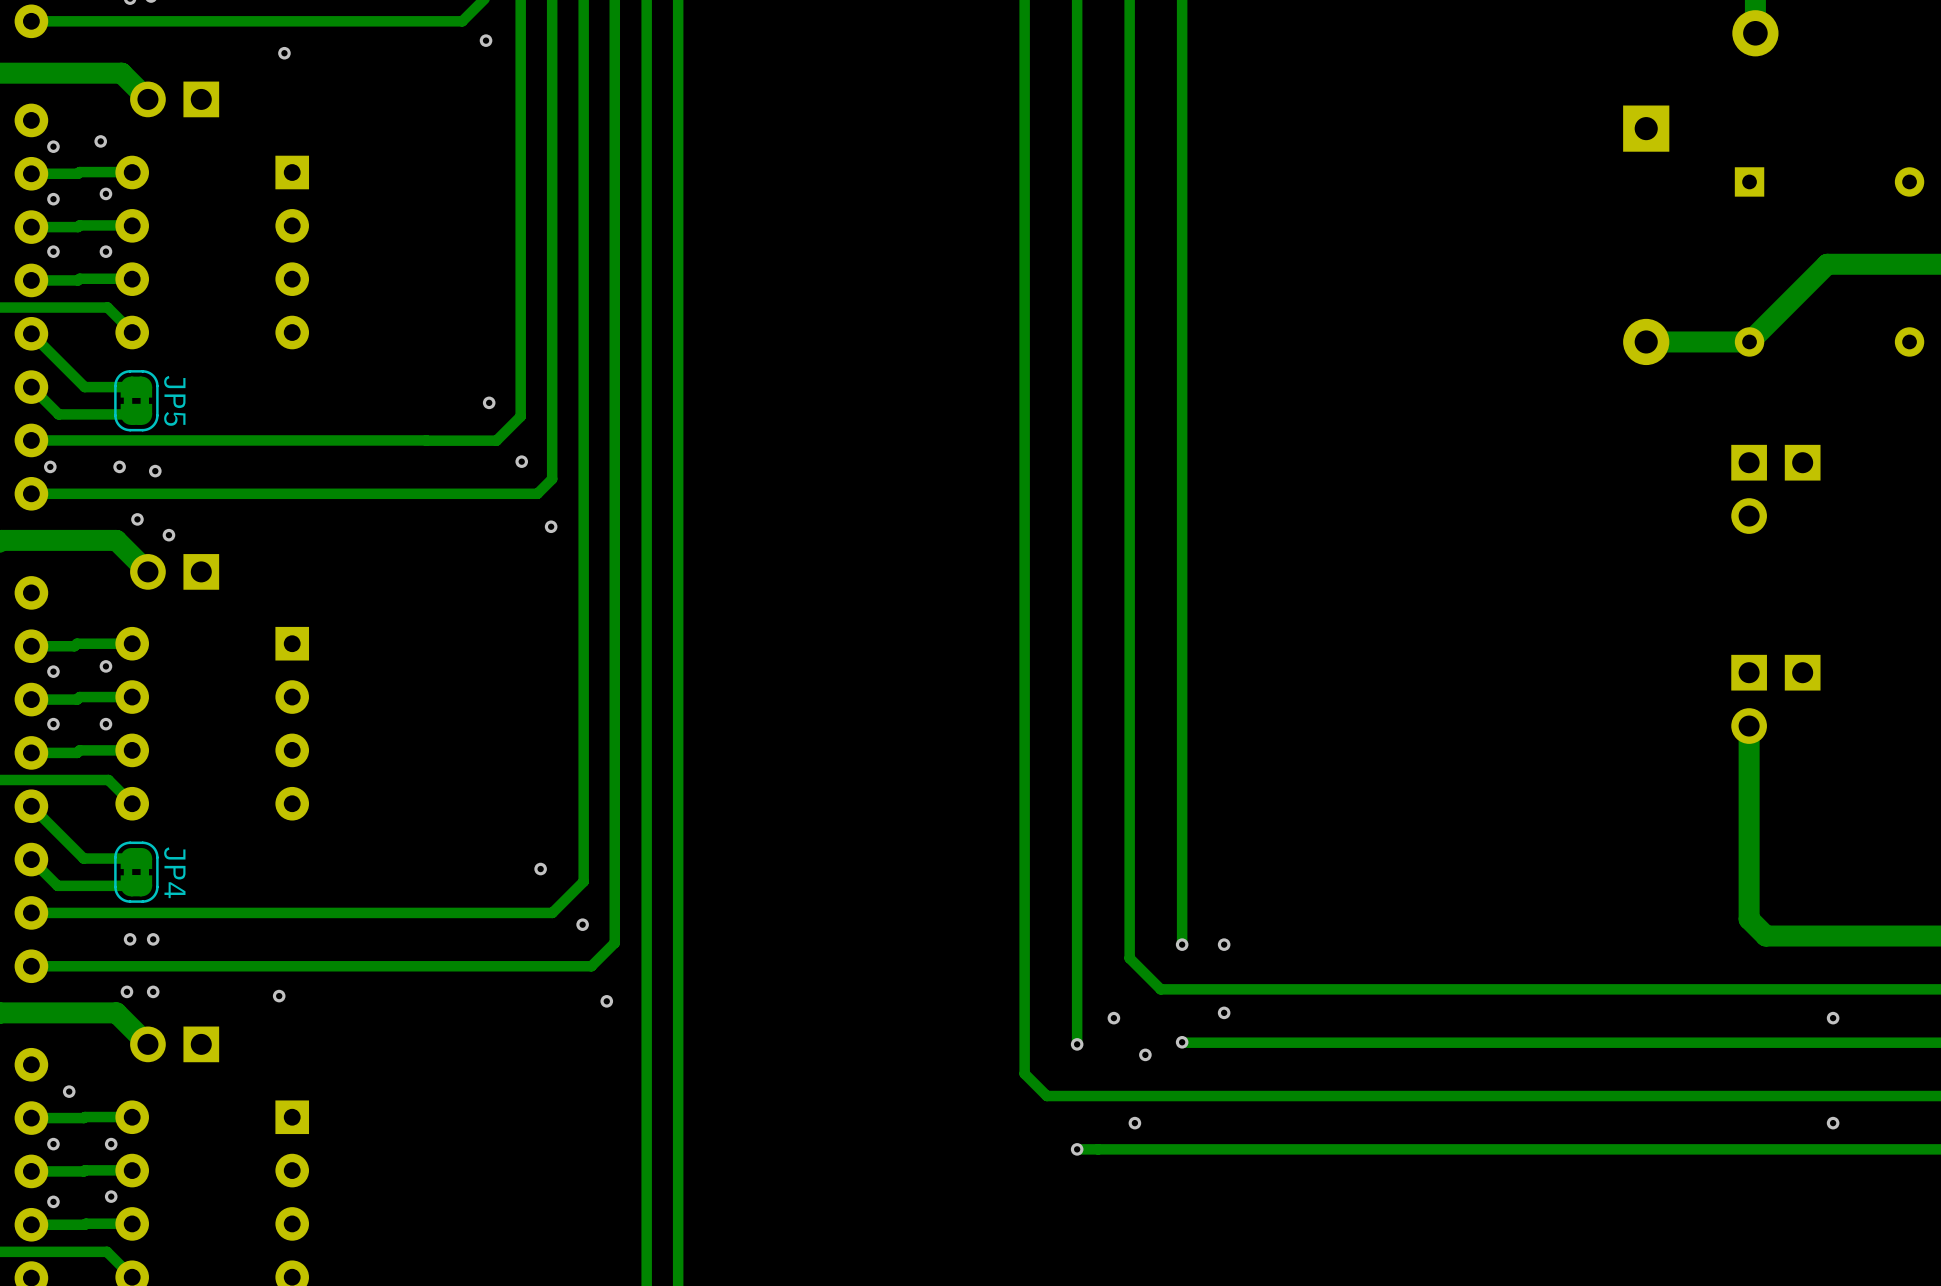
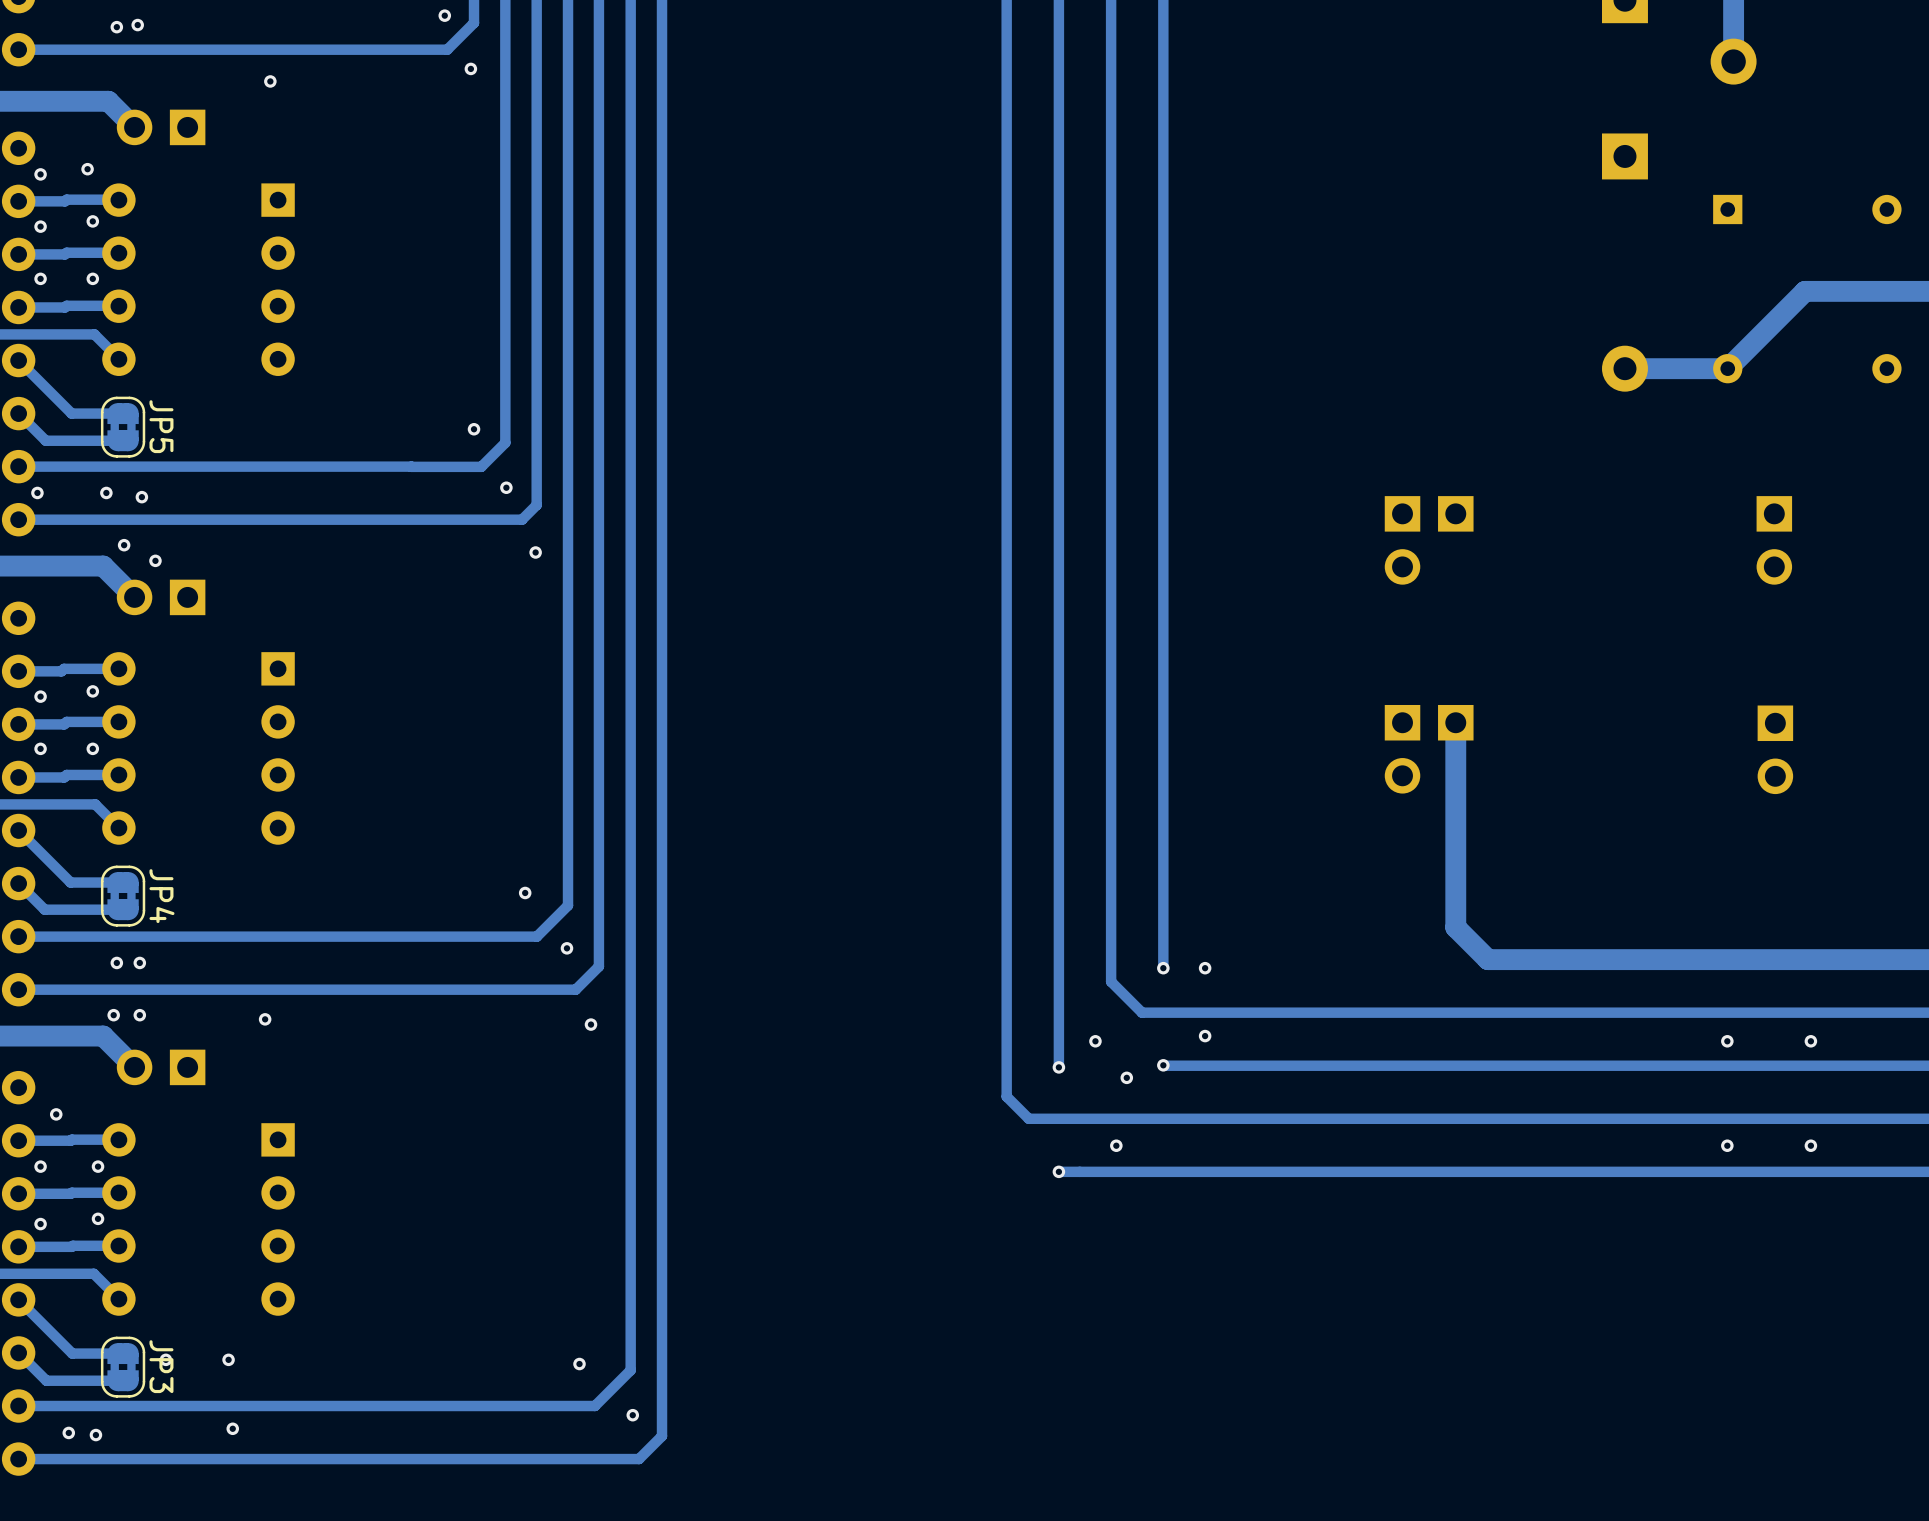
part: (1802, 462) -> none
part: none -> (1455, 513)
part position: (1749, 489) -> (1774, 540)
part: none -> (1402, 540)
part: (1802, 672) -> none
part: none -> (1455, 722)
part position: (1749, 699) -> (1775, 749)
part: none -> (1402, 749)
track: (1749, 726) (1749, 919) (1765, 936) -> (1455, 722) (1455, 927) (1487, 959) (1744, 959)
via: none -> (1727, 1041)
via: none -> (1727, 1145)

